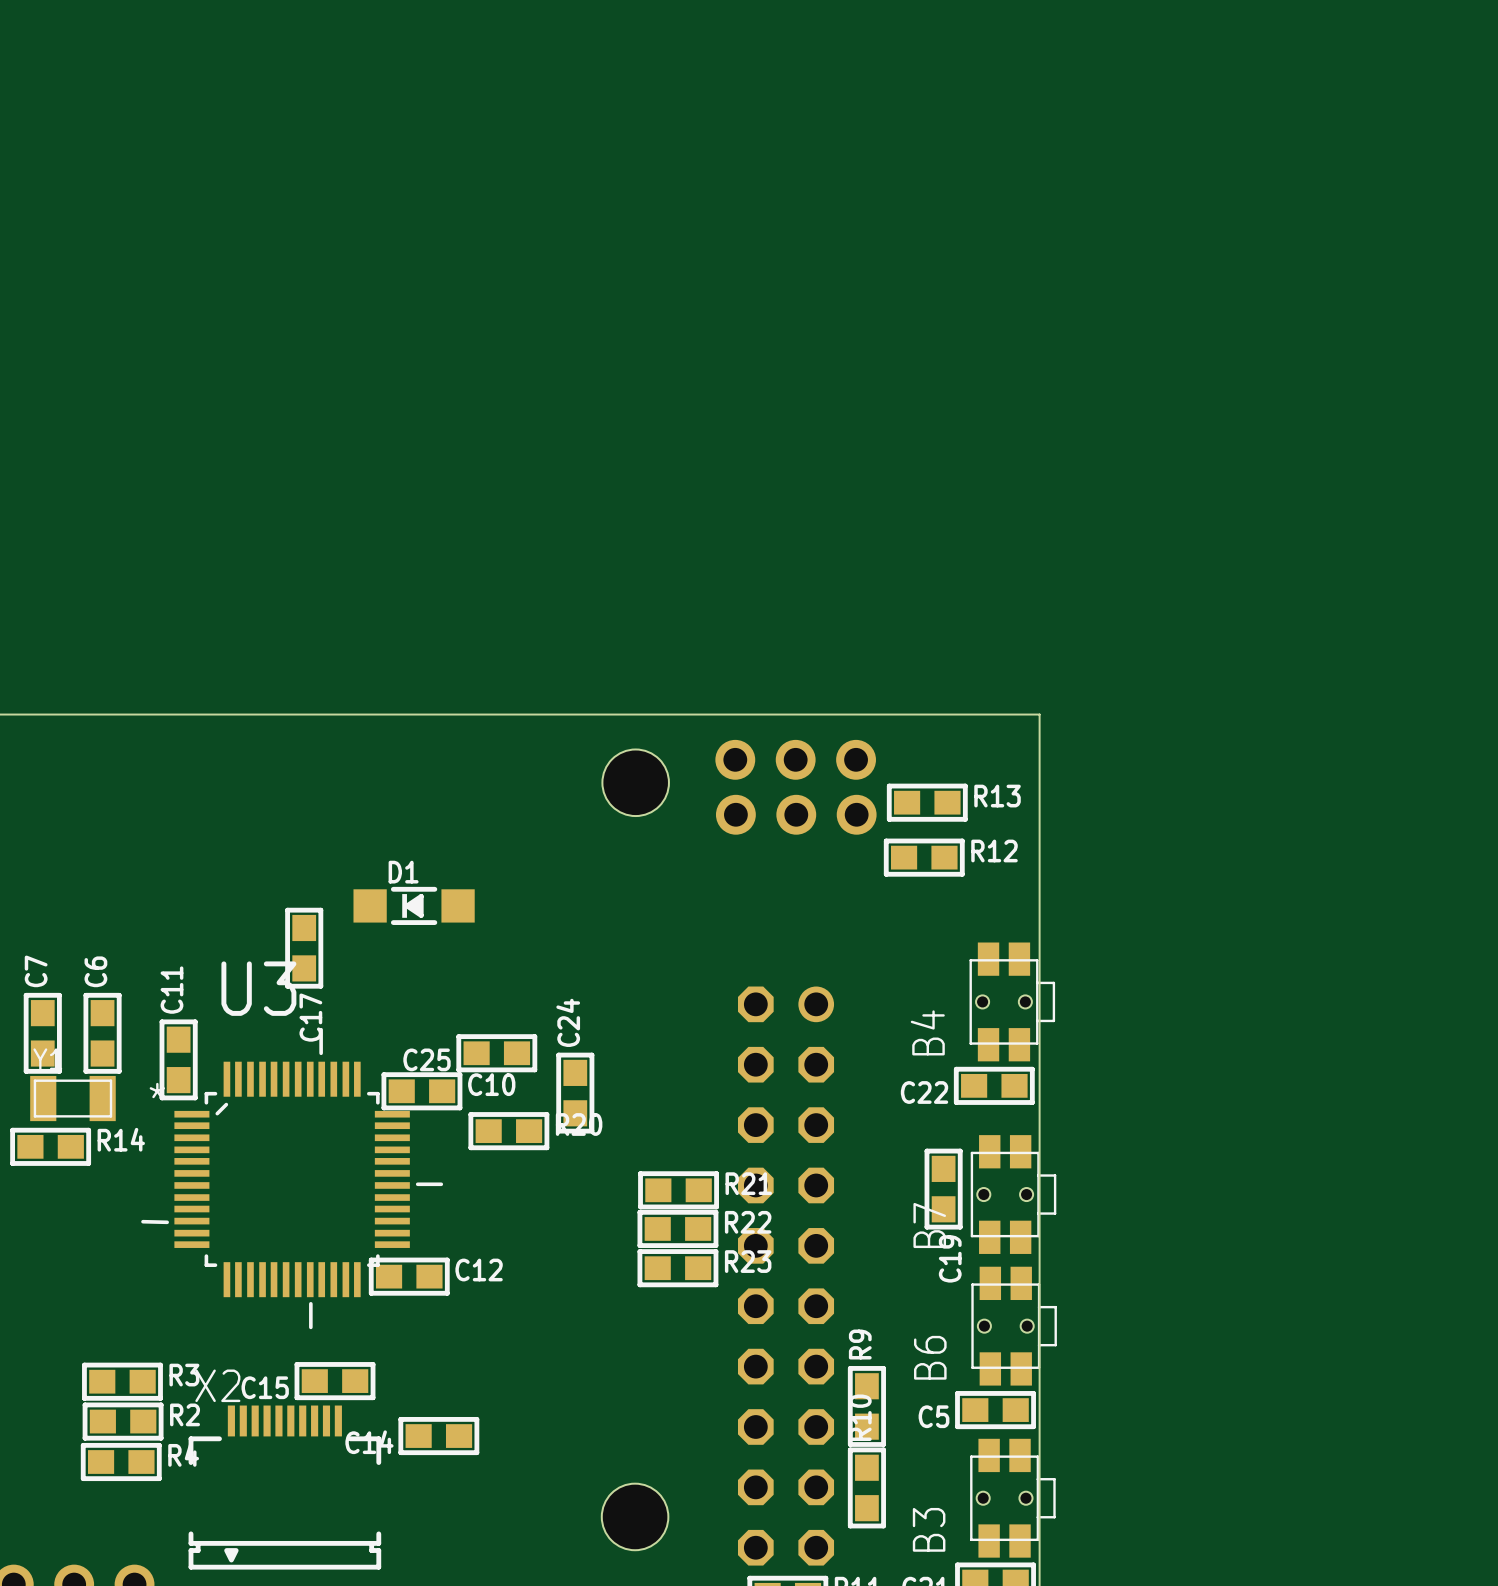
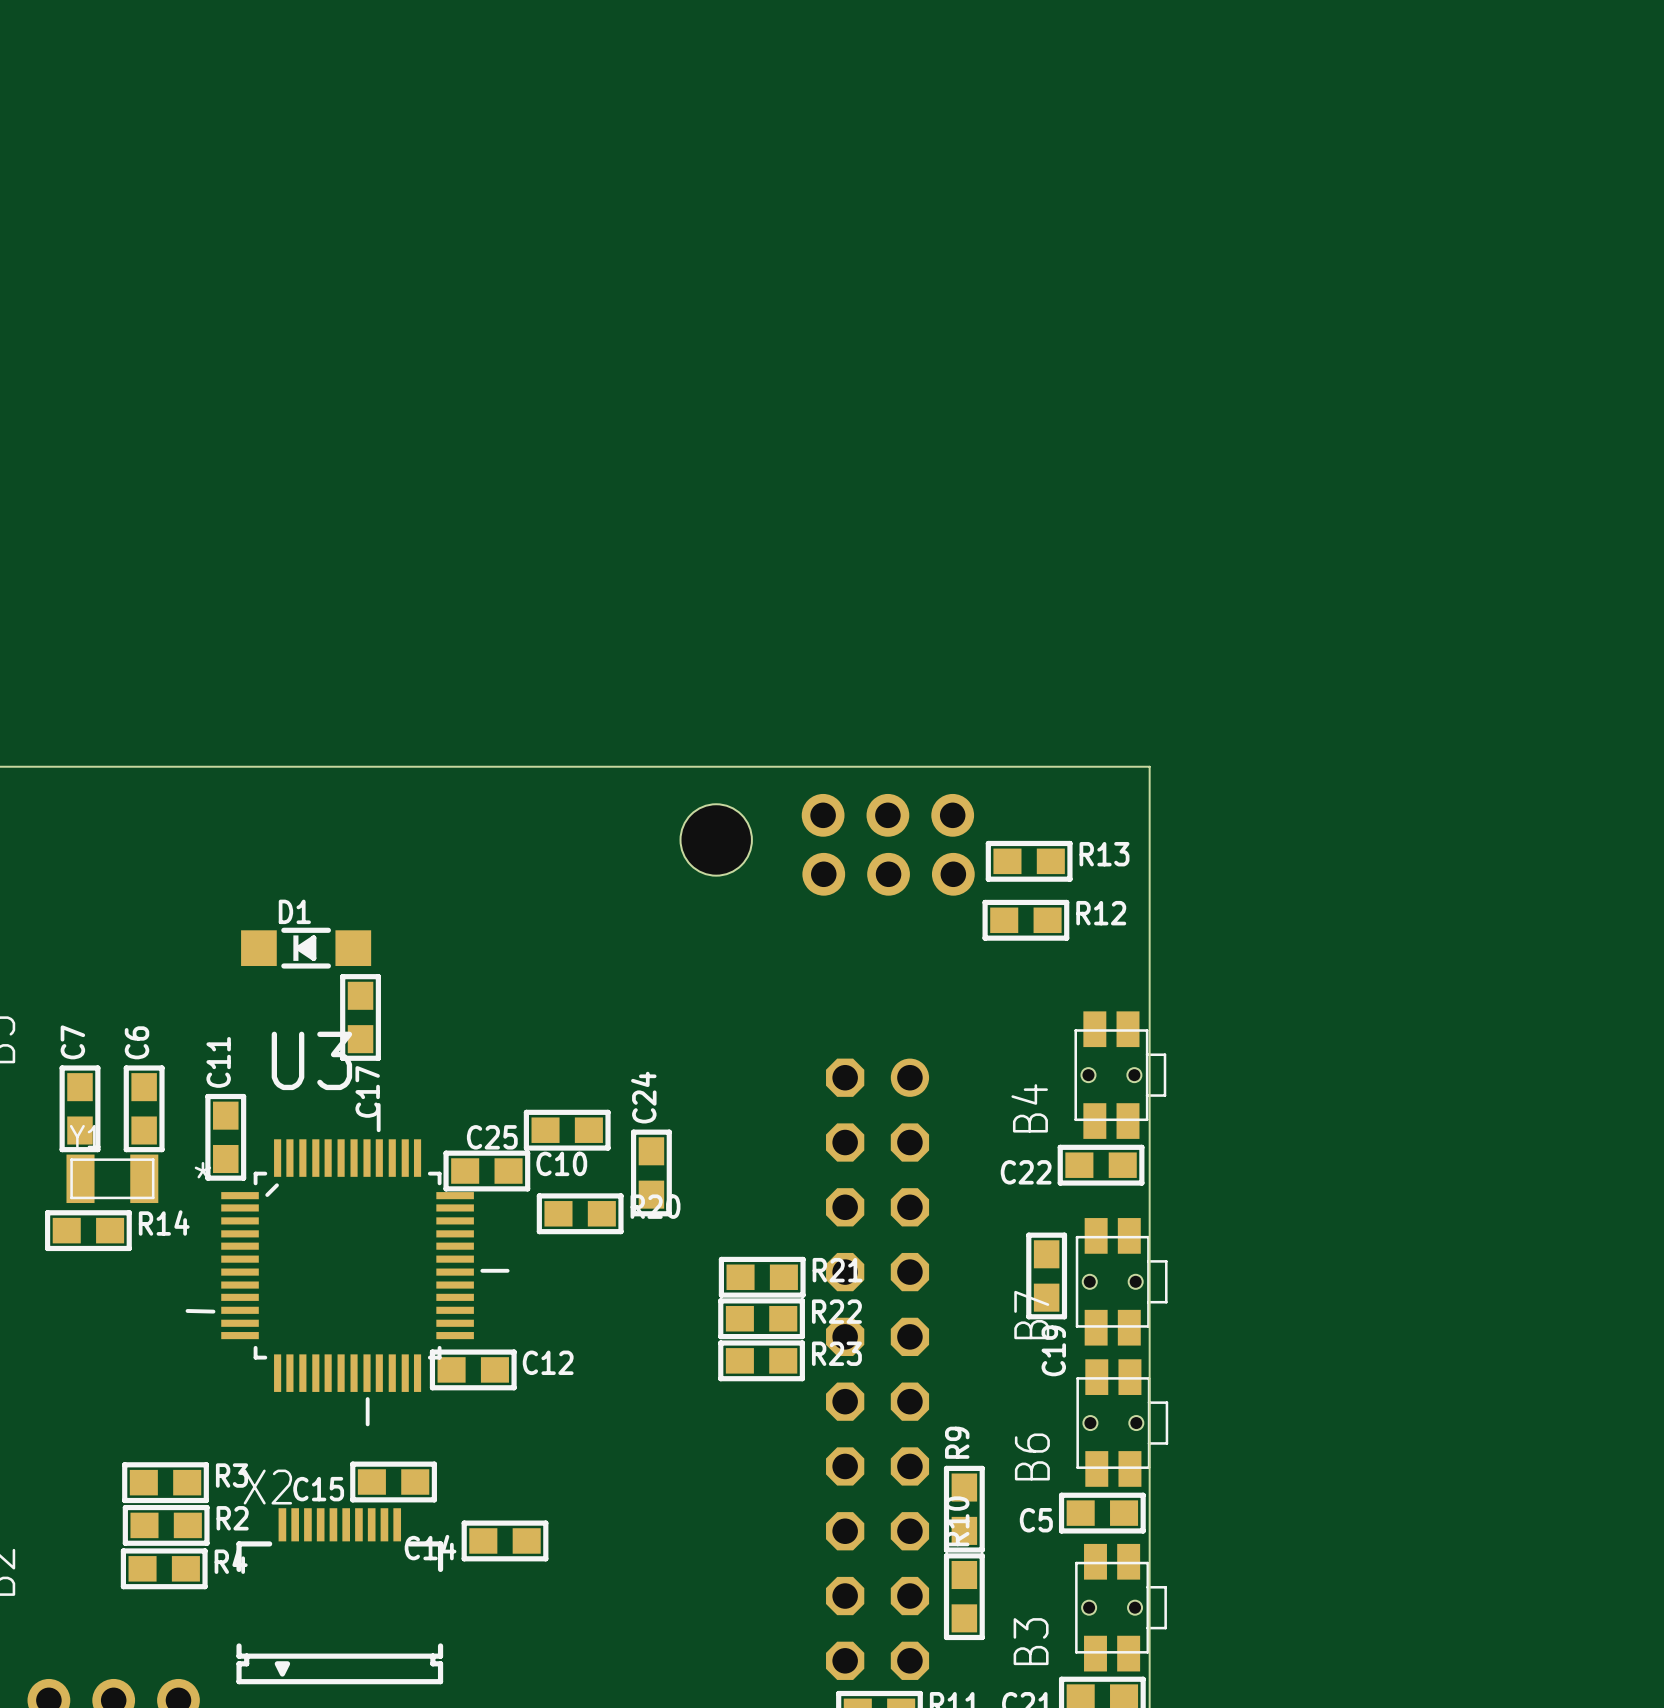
D1 position: (414, 905) -> (306, 948)
hole: (635, 1516) -> none

